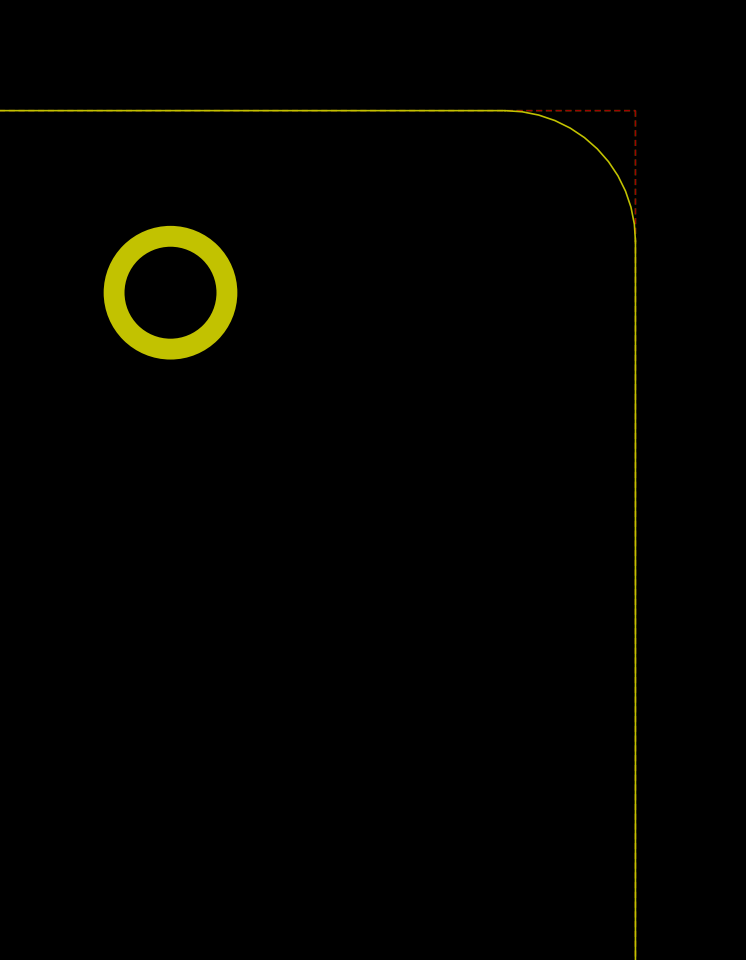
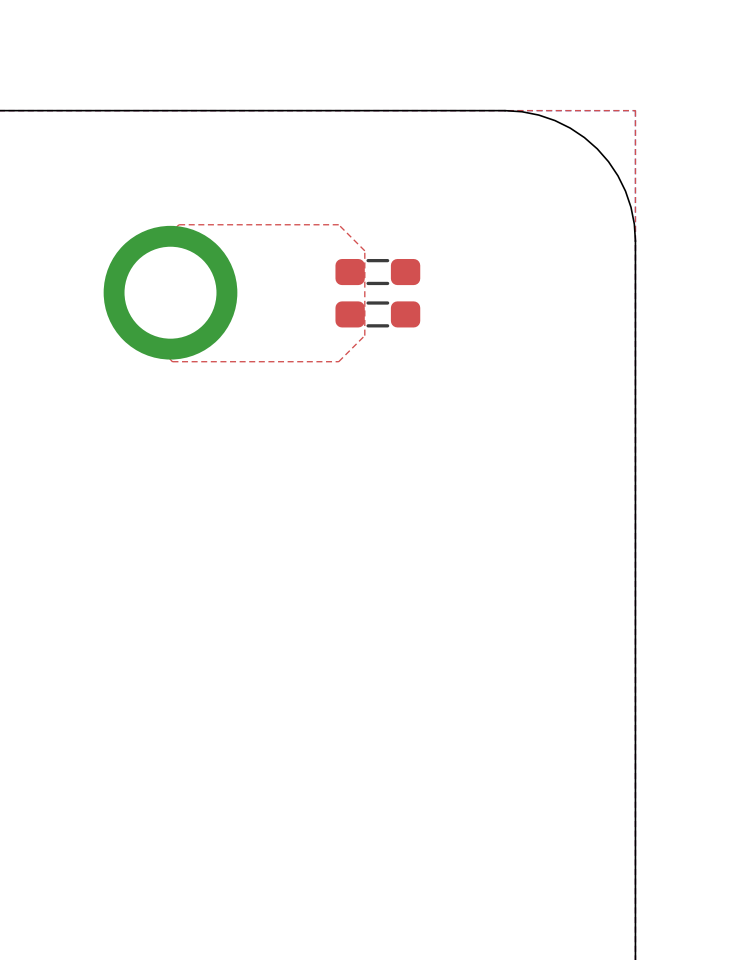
top zone outline: none -> (178, 224) (338, 224) (364, 250) (364, 335) (338, 361) (172, 361) (110, 293) (178, 224)
part: none -> (377, 272)
part: none -> (377, 314)

